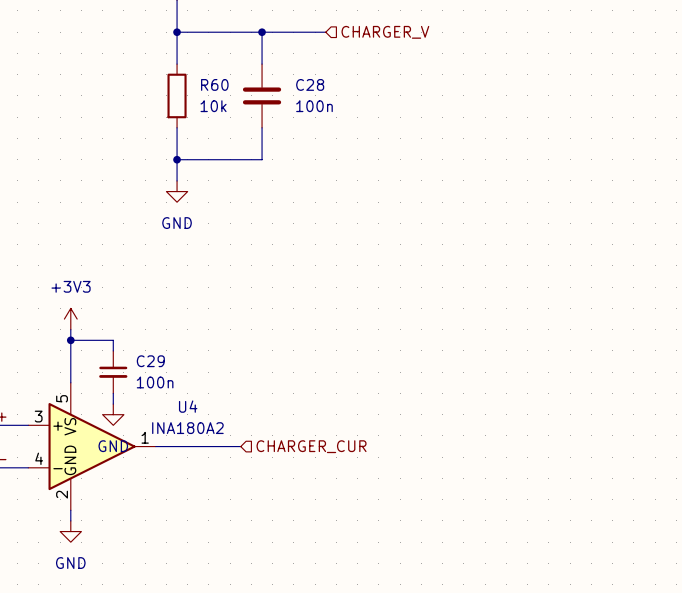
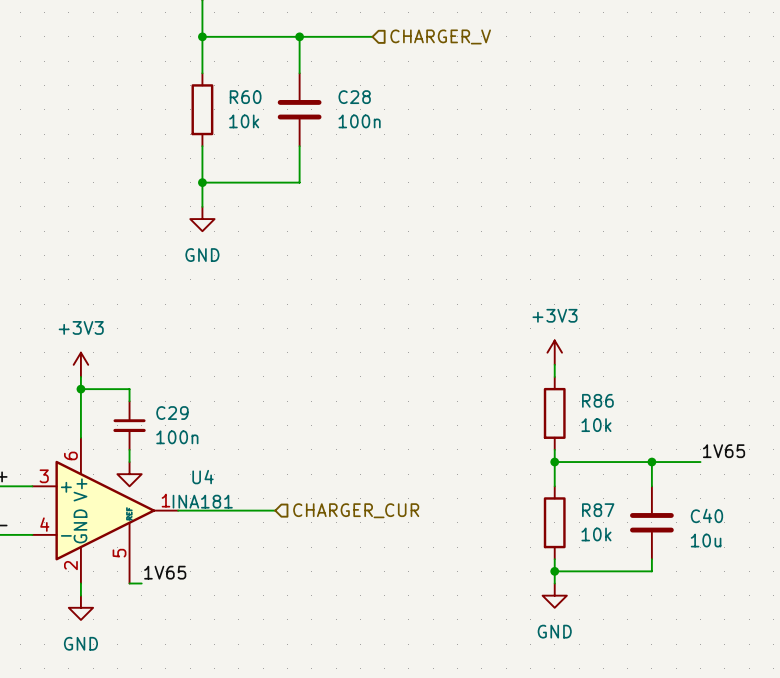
power symbol: none -> +3V3 (554, 352)
wire: none -> (554, 364) (554, 376)
R86: none -> 10k (554, 413)
U4 symbol: [28, 382, 156, 511] -> [32, 437, 179, 584]
wire: none -> (554, 449) (554, 486)
label: none -> 1V65 (724, 451)
wire: none -> (554, 462) (700, 462)
junction: none -> (554, 462)
wire: none -> (651, 462) (651, 486)
junction: none -> (651, 462)
U4 value: INA180A2 (187, 428) -> INA181 (202, 501)
power symbol text: GND (113, 446) -> none
R87: none -> 10k (554, 522)
C40: none -> 10u (651, 522)
wire: none -> (554, 559) (554, 583)
wire: none -> (651, 559) (651, 571) (554, 571)
junction: none -> (554, 571)
label: none -> 1V65 (165, 572)
wire: none -> (129, 583) (141, 583)
power symbol: none -> GND (554, 595)

